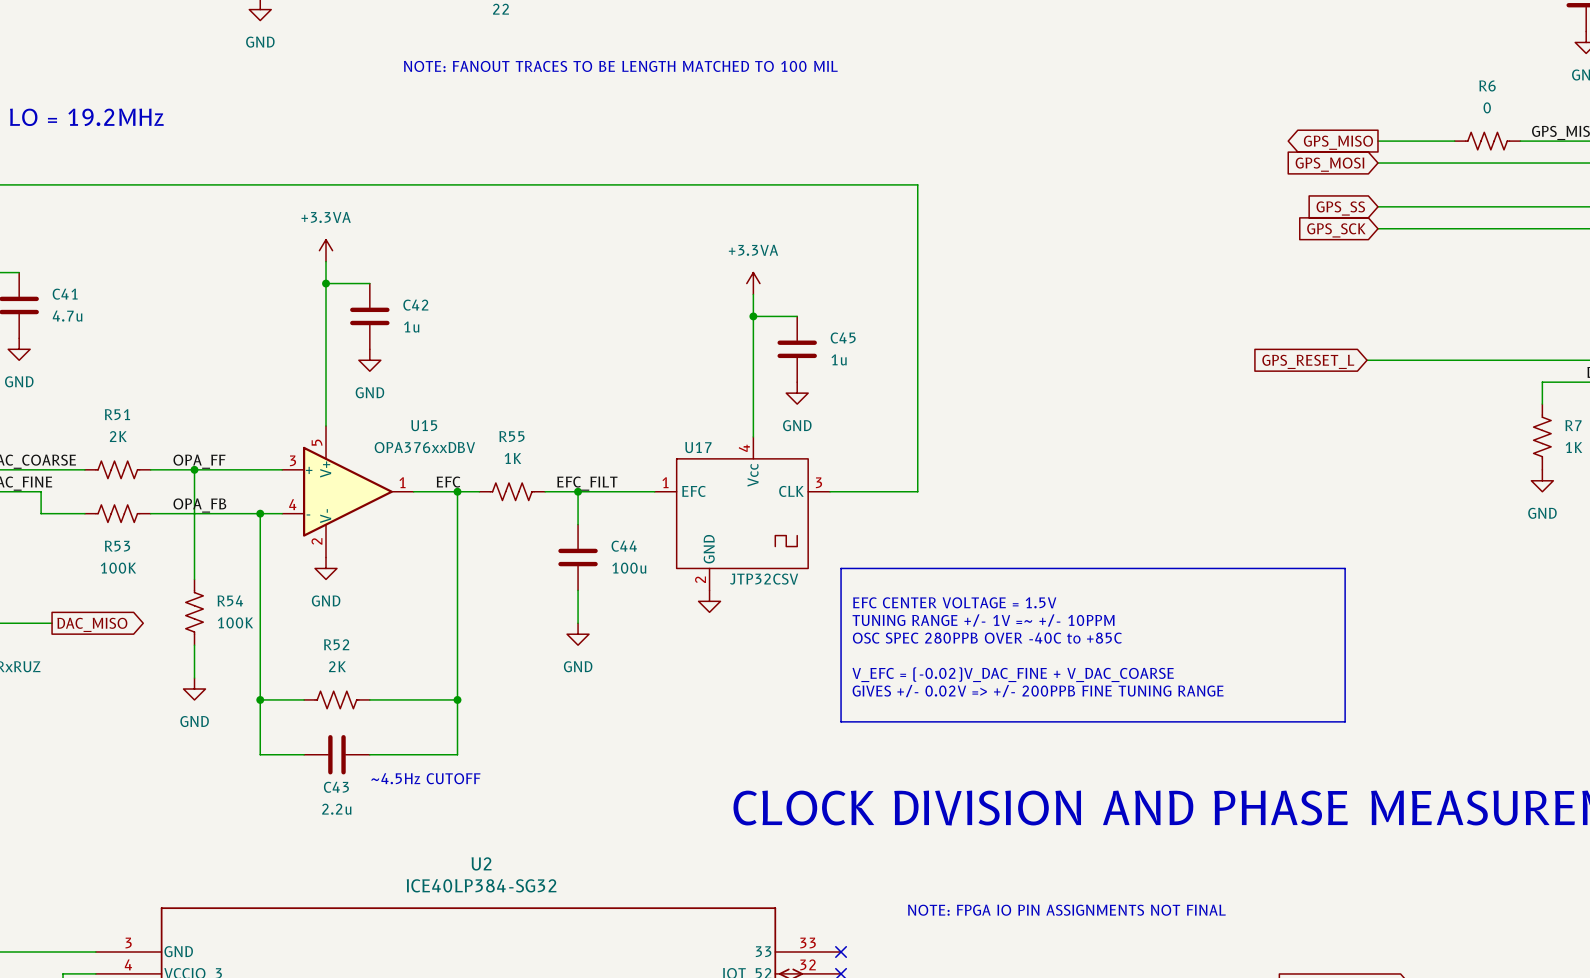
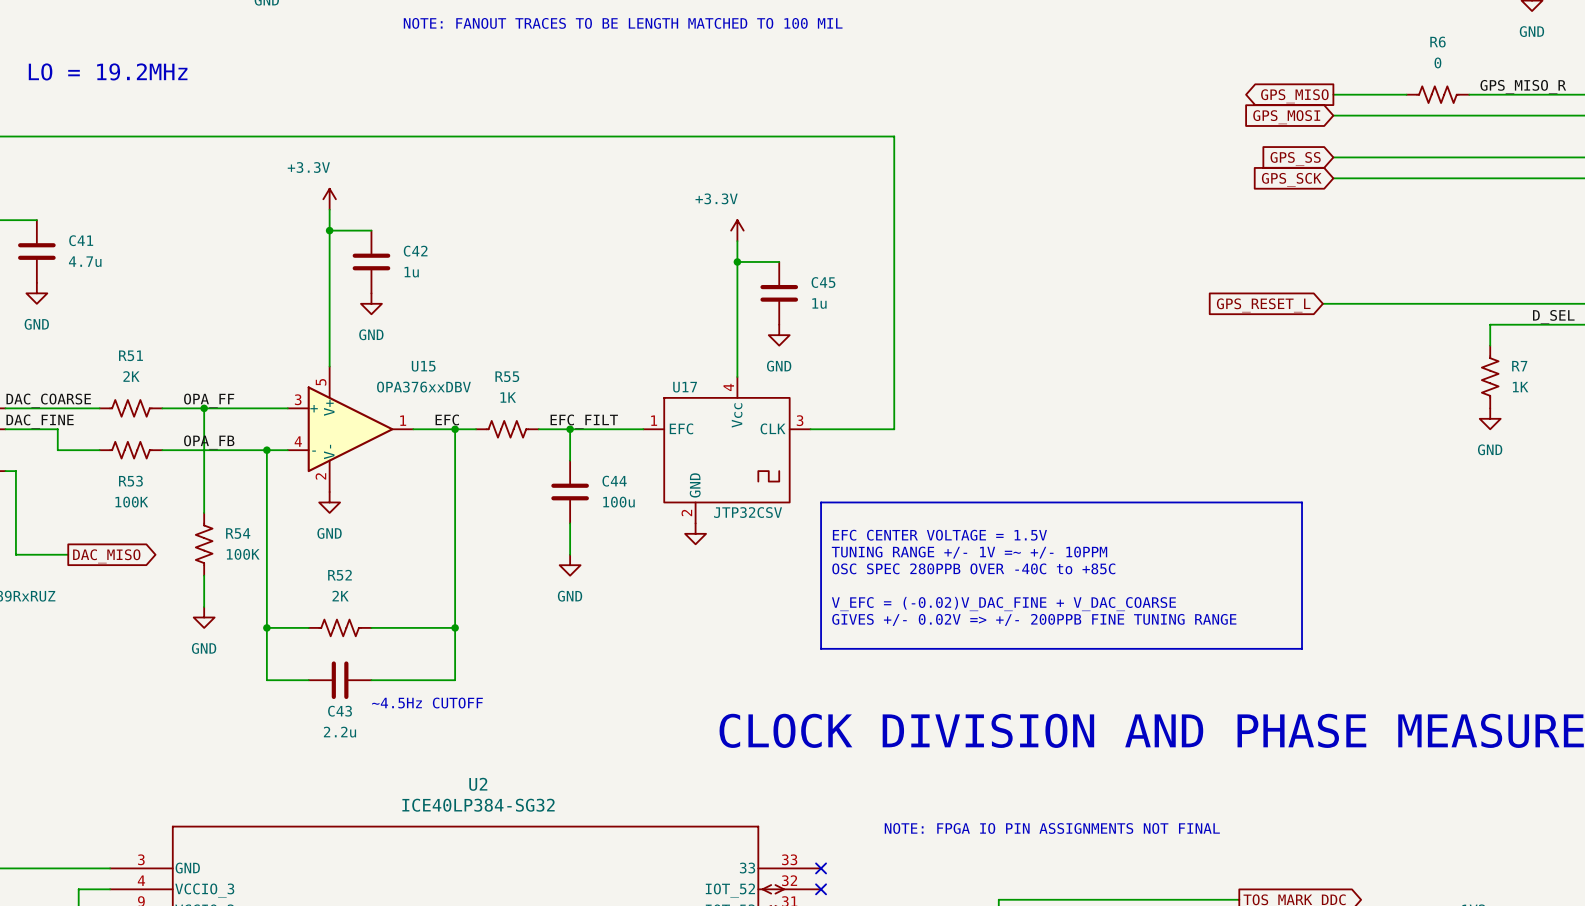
power symbol: +3.3VA (326, 250) -> +3.3V (329, 199)
power symbol: +3.3VA (753, 283) -> +3.3V (737, 230)

